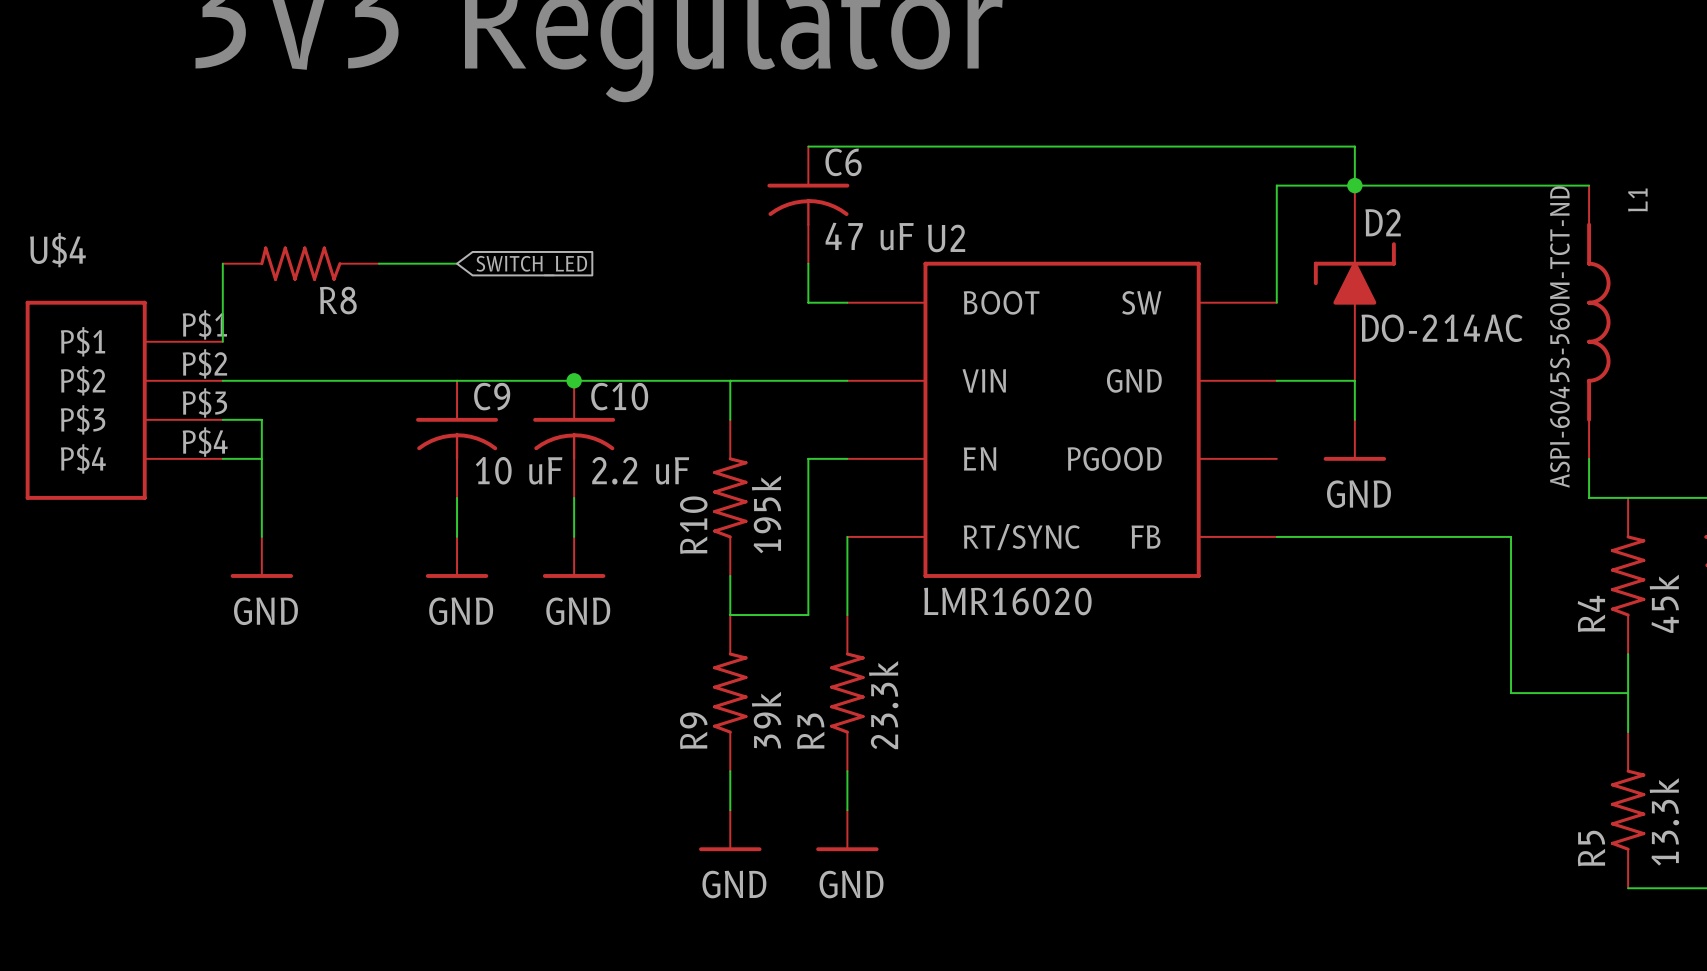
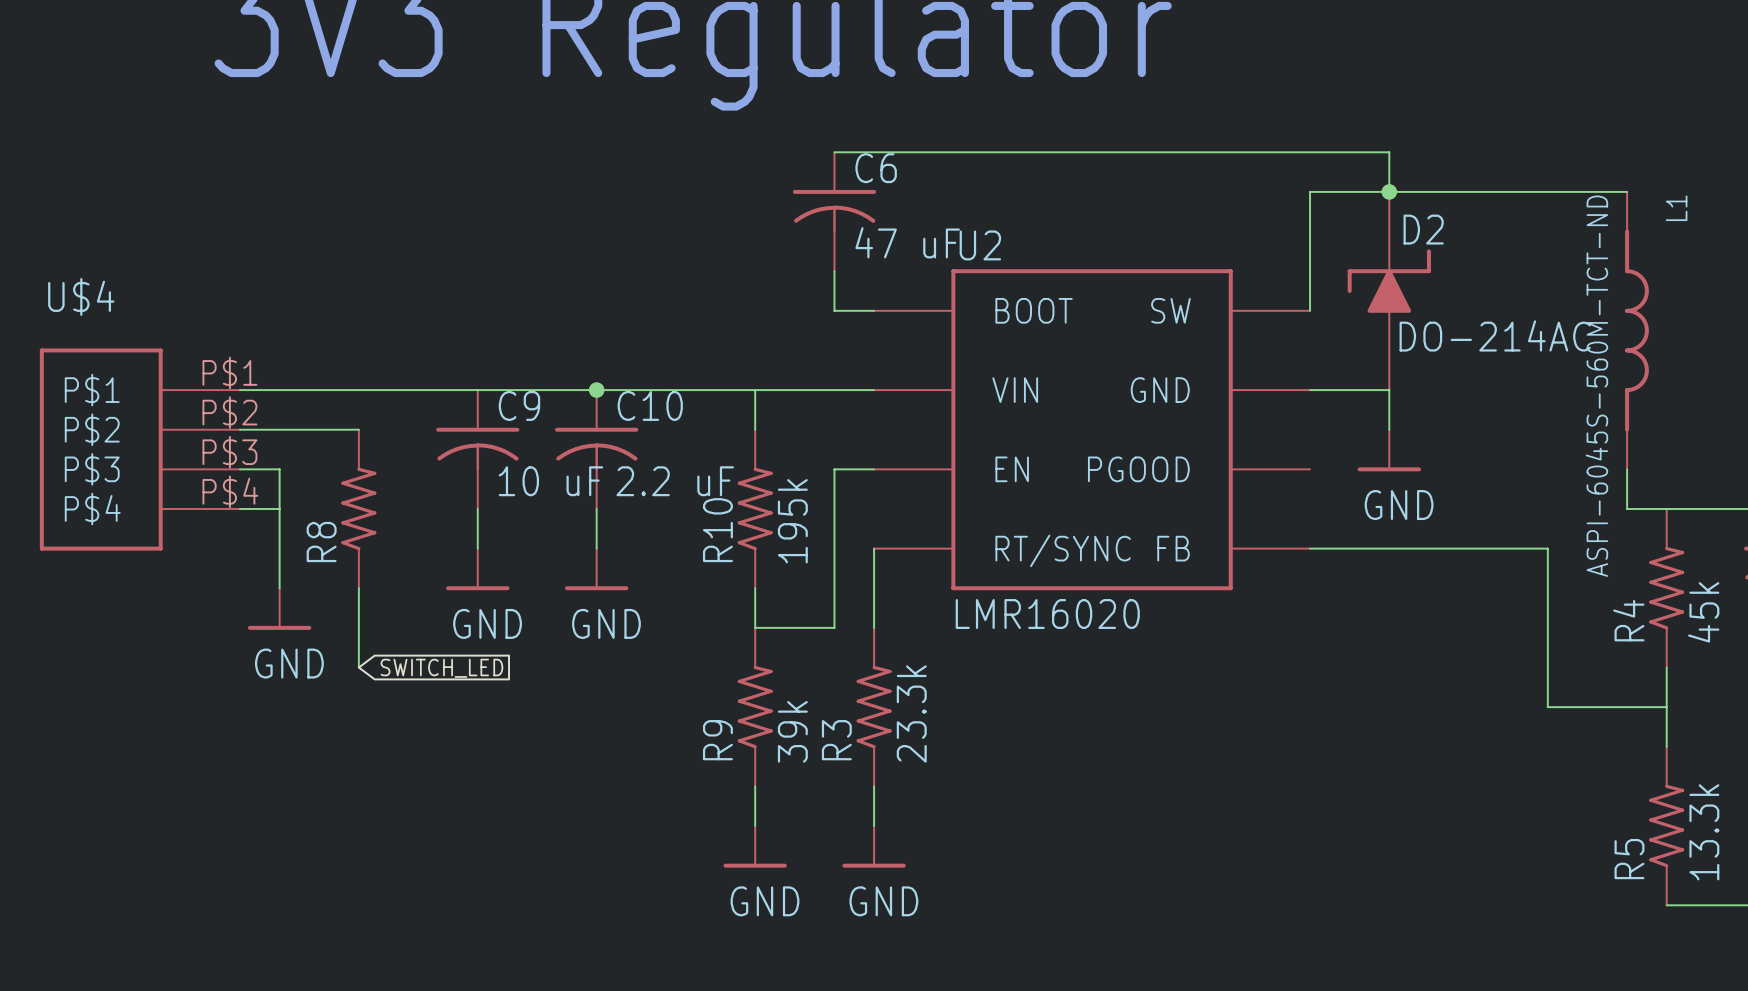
wire: (222, 263) (222, 341) -> (358, 588) (358, 667)
R8 rotation: 0° (300, 263) -> 90° clockwise (358, 508)
R8 position: (300, 263) -> (358, 508)
wire: (378, 263) (457, 263) -> none
global label: SWITCH_LED (531, 266) -> none
U$4 position: (124, 400) -> (139, 449)
wire: (261, 419) (261, 458) -> (279, 429) (358, 429)
wire: none -> (239, 508) (279, 508)
power symbol position: GND (261, 557) -> GND (279, 609)
global label: none -> SWITCH_LED (441, 668)

